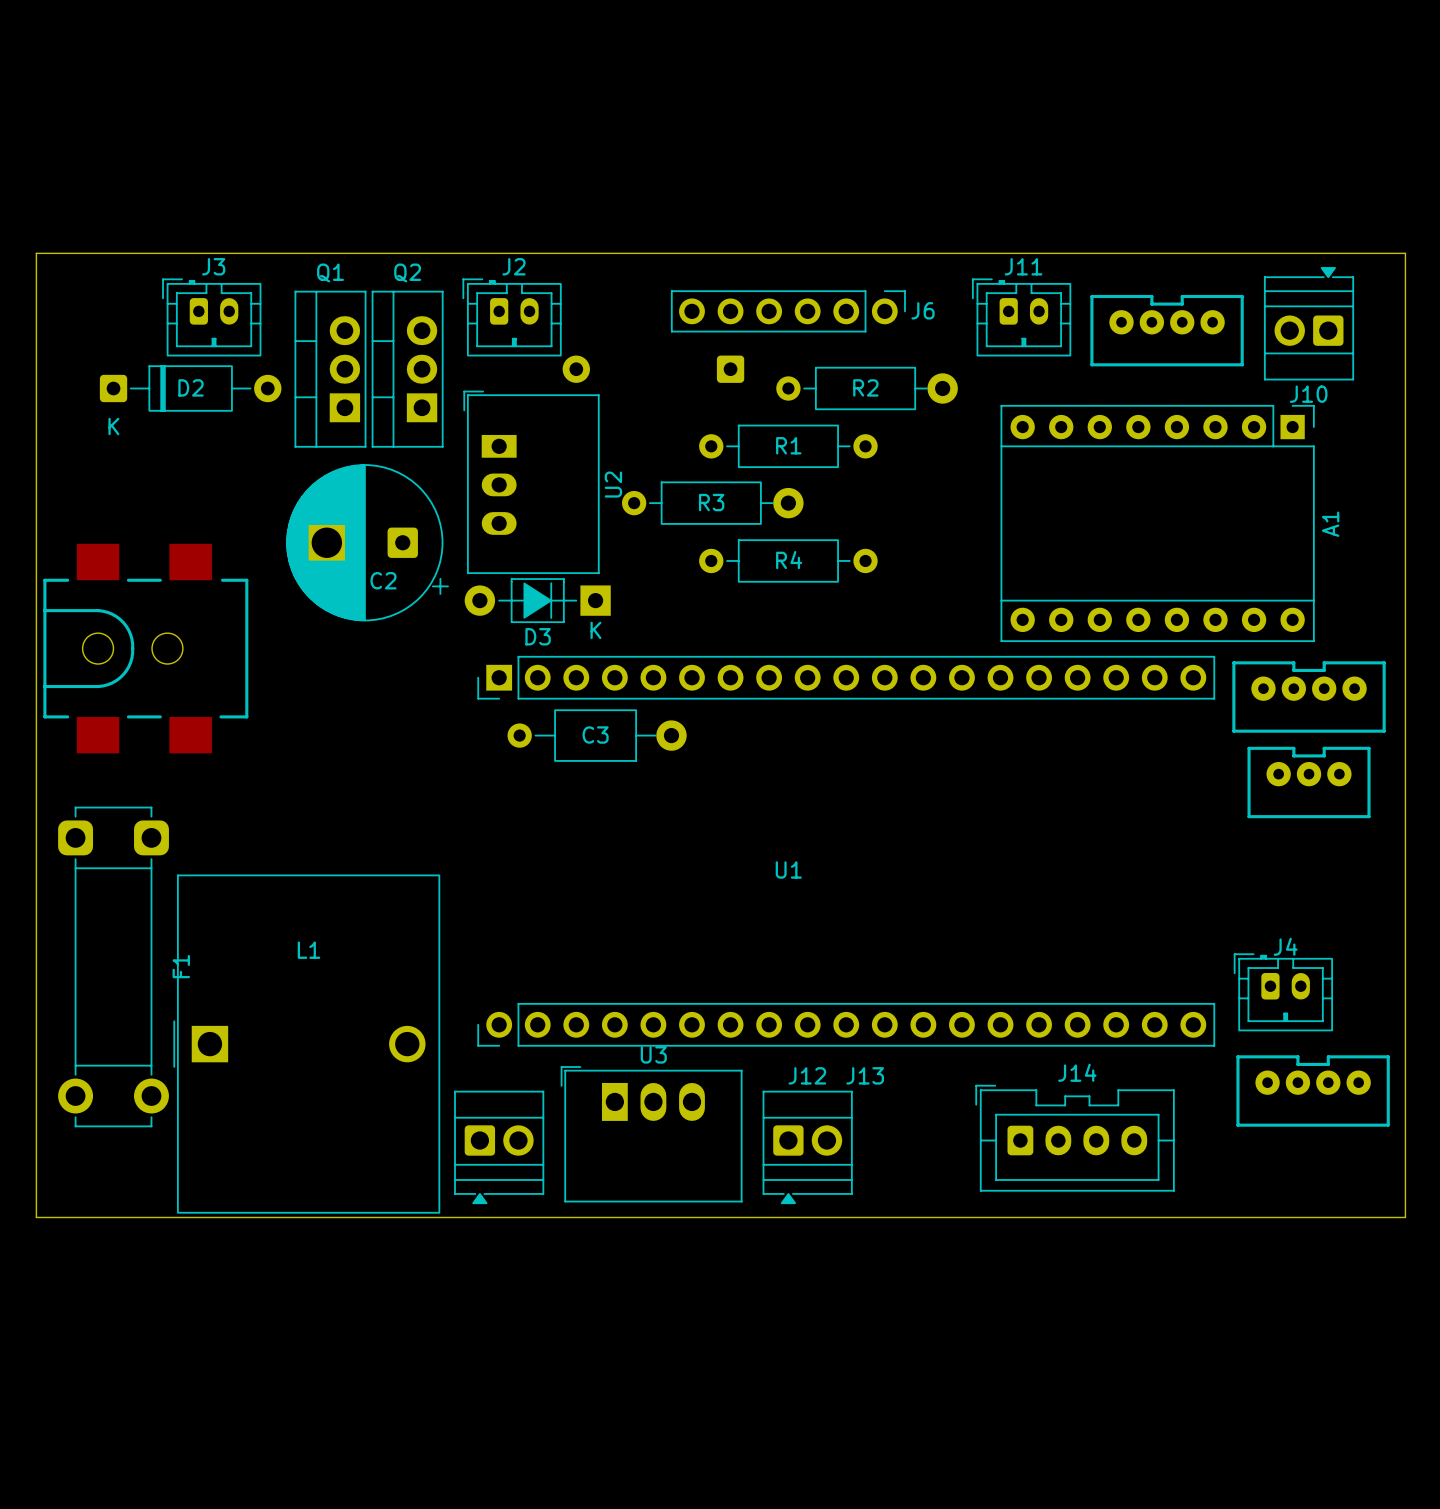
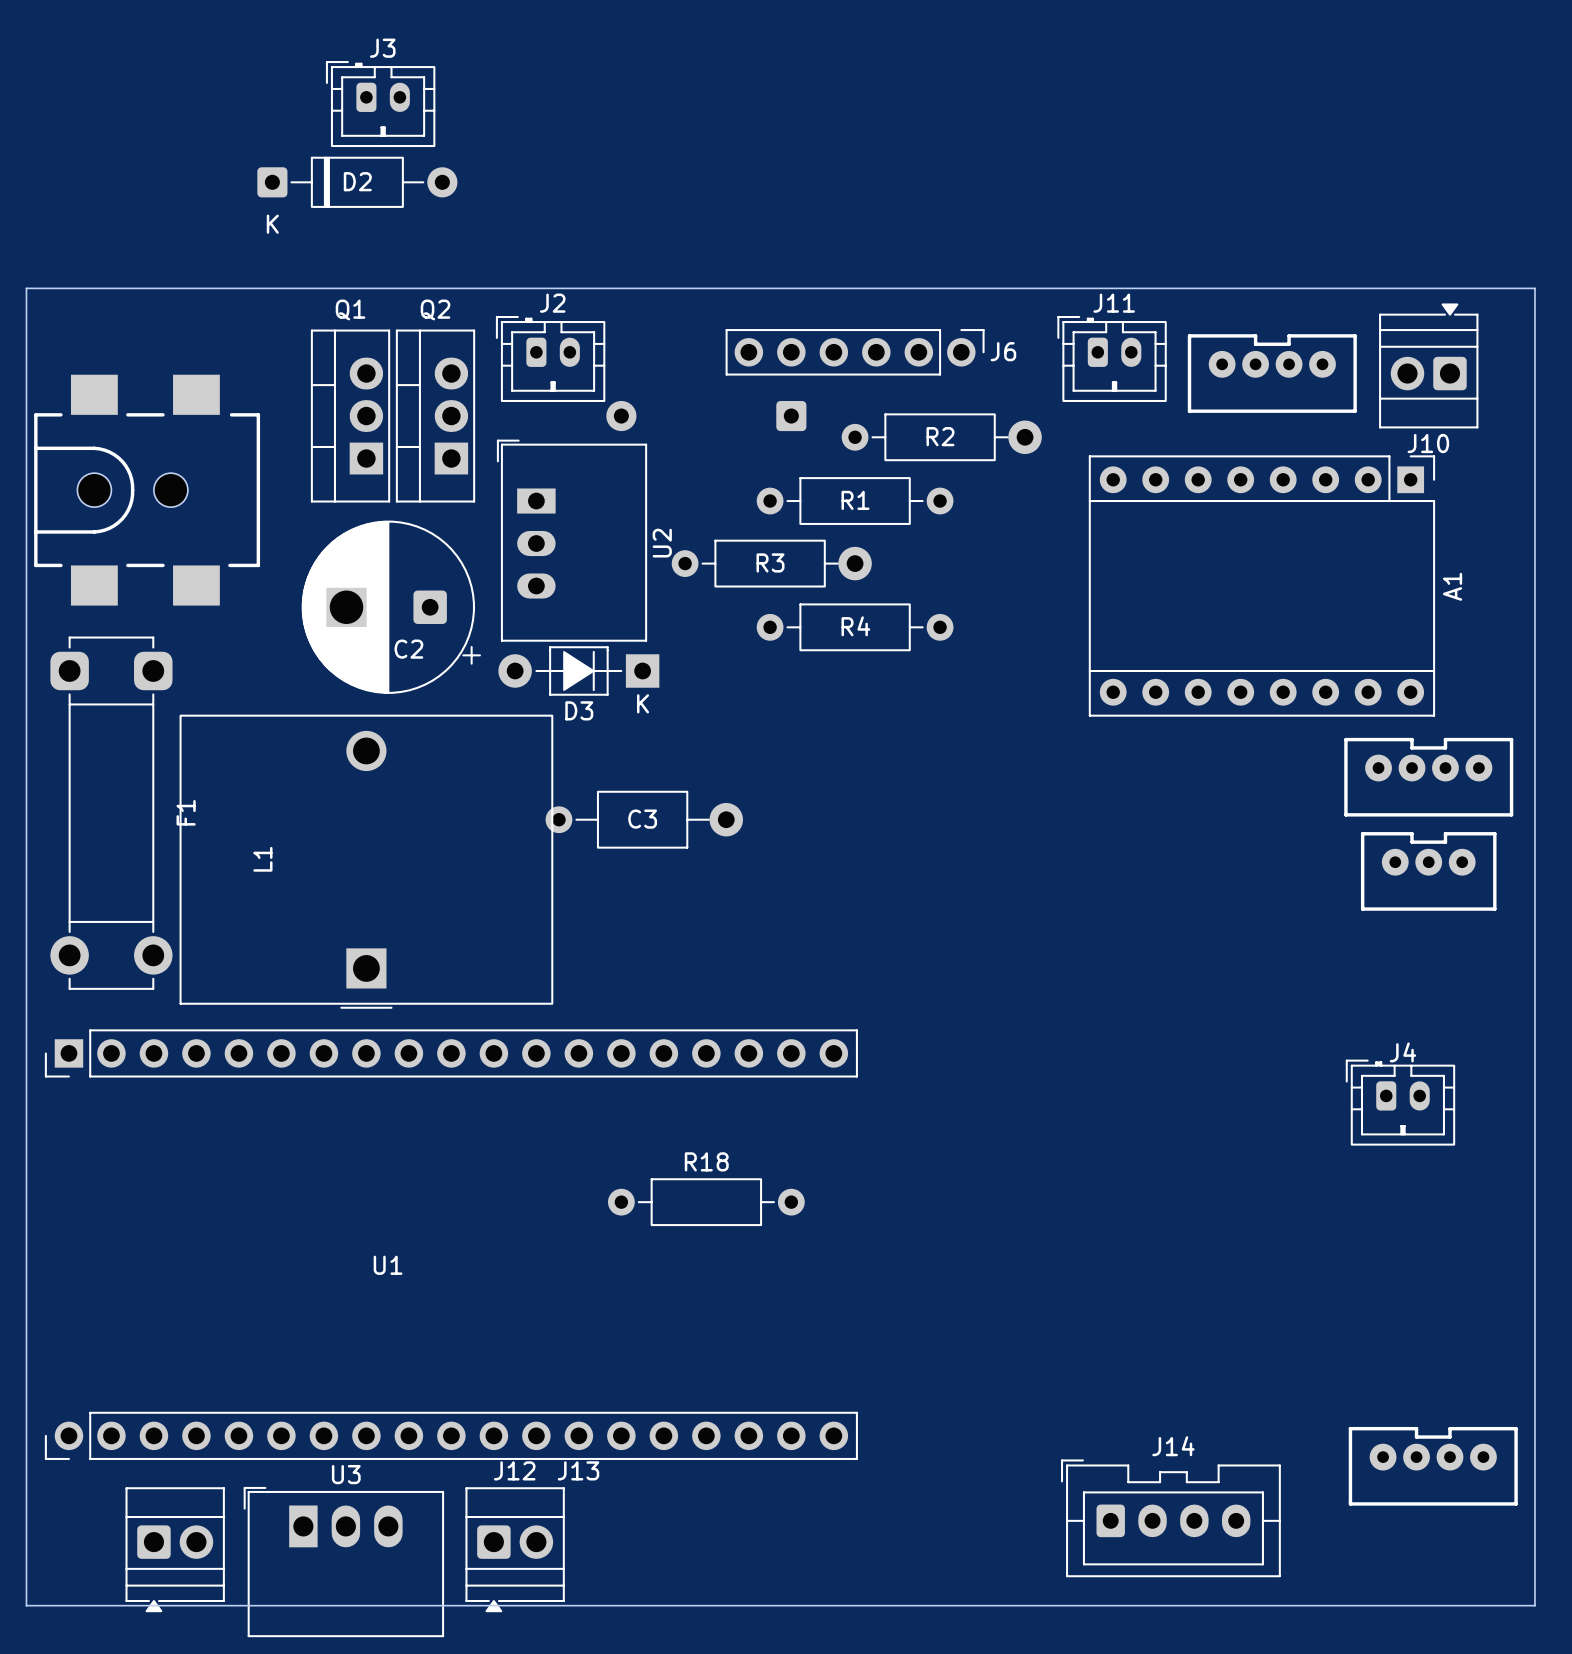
J3 position: (211, 317) -> (380, 104)
D2 position: (190, 388) -> (357, 182)
part position: (145, 648) -> (147, 490)
U1 position: (846, 851) -> (451, 1244)
F1 position: (113, 966) -> (111, 813)
L1 rotation: 0° (306, 1044) -> 90° counterclockwise (366, 861)
L1 position: (306, 1044) -> (366, 861)
R18: none -> (706, 1202)
part position: (1313, 1091) -> (1433, 1466)
U3 position: (651, 1134) -> (343, 1562)
J14 position: (1075, 1138) -> (1170, 1518)
J13 position: (499, 1147) -> (175, 1549)
J12 position: (807, 1147) -> (515, 1549)
board edge: (36, 1217) (1405, 1217) -> (26, 1350) (26, 1605) (1534, 1605) (1534, 1350)

